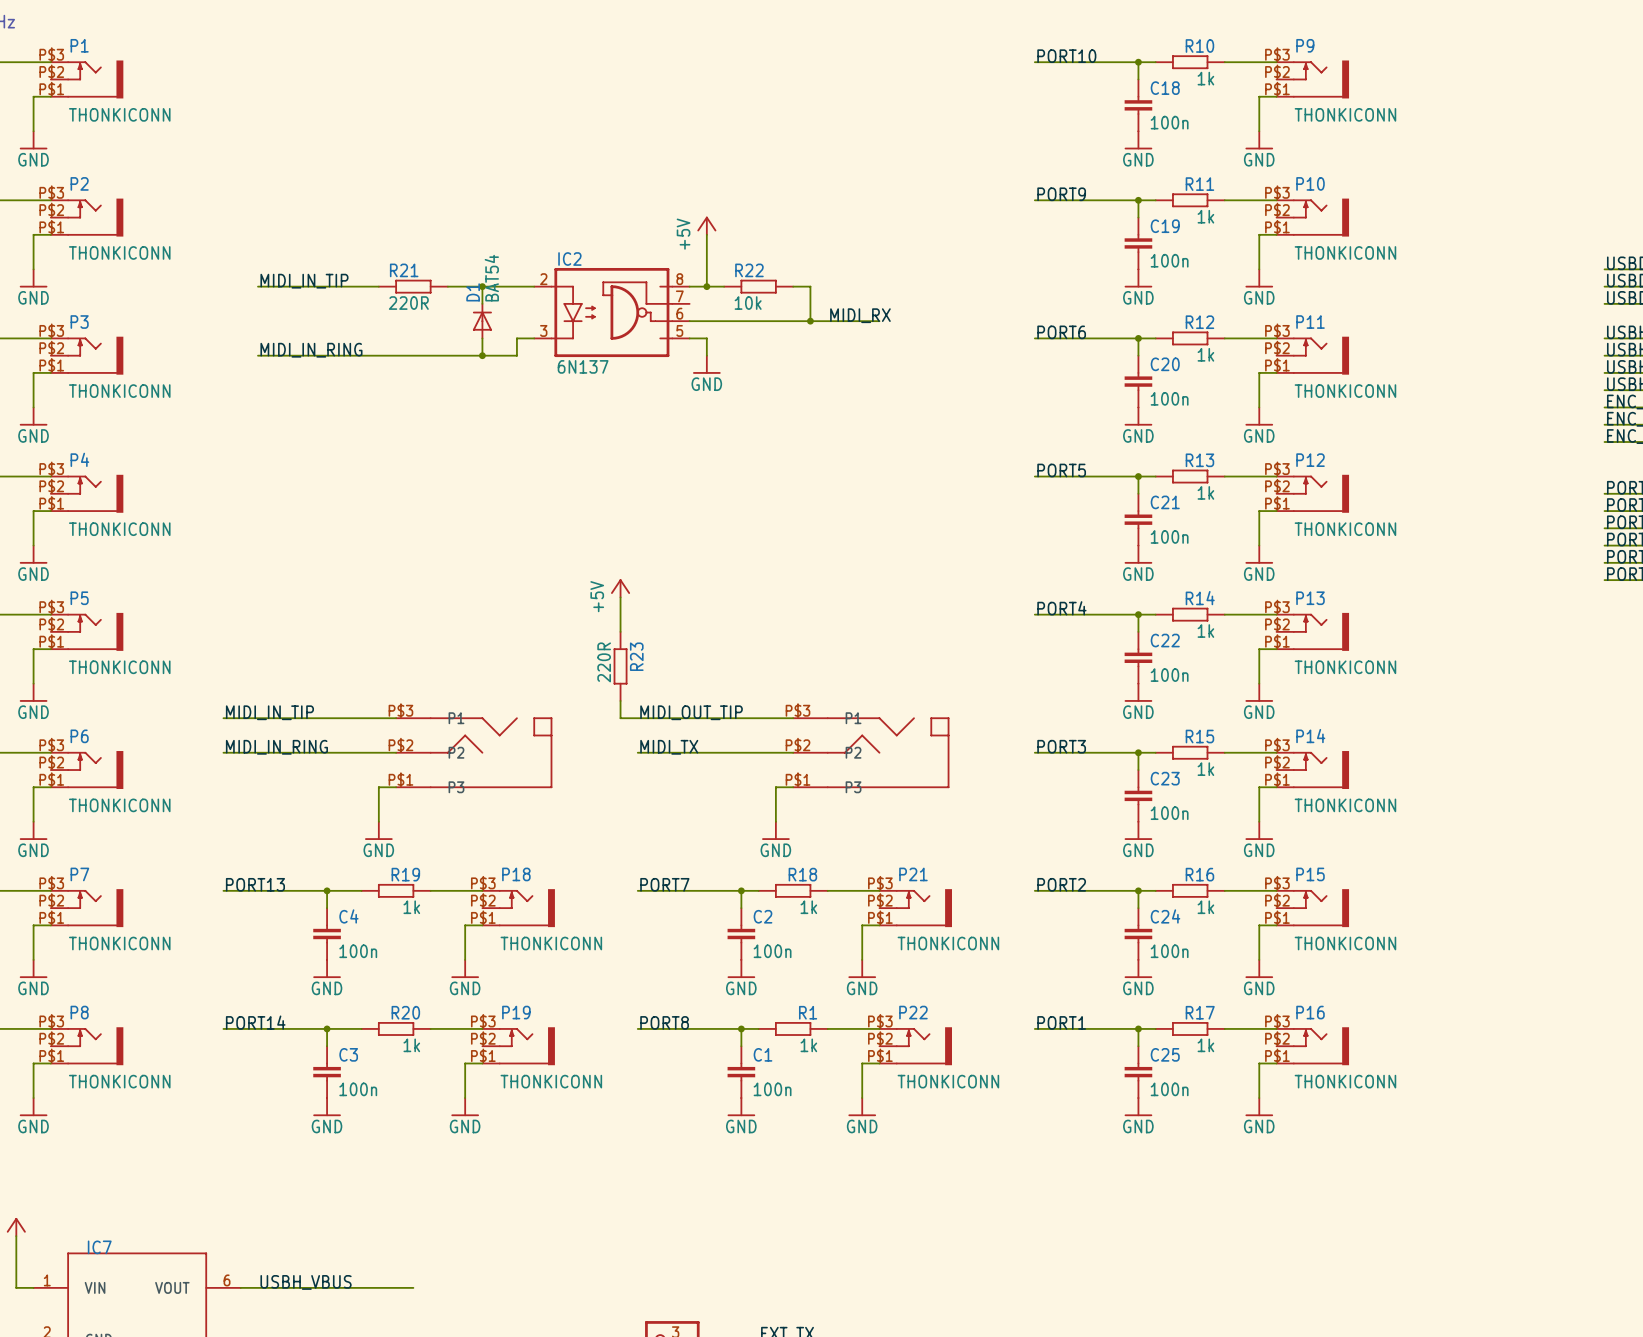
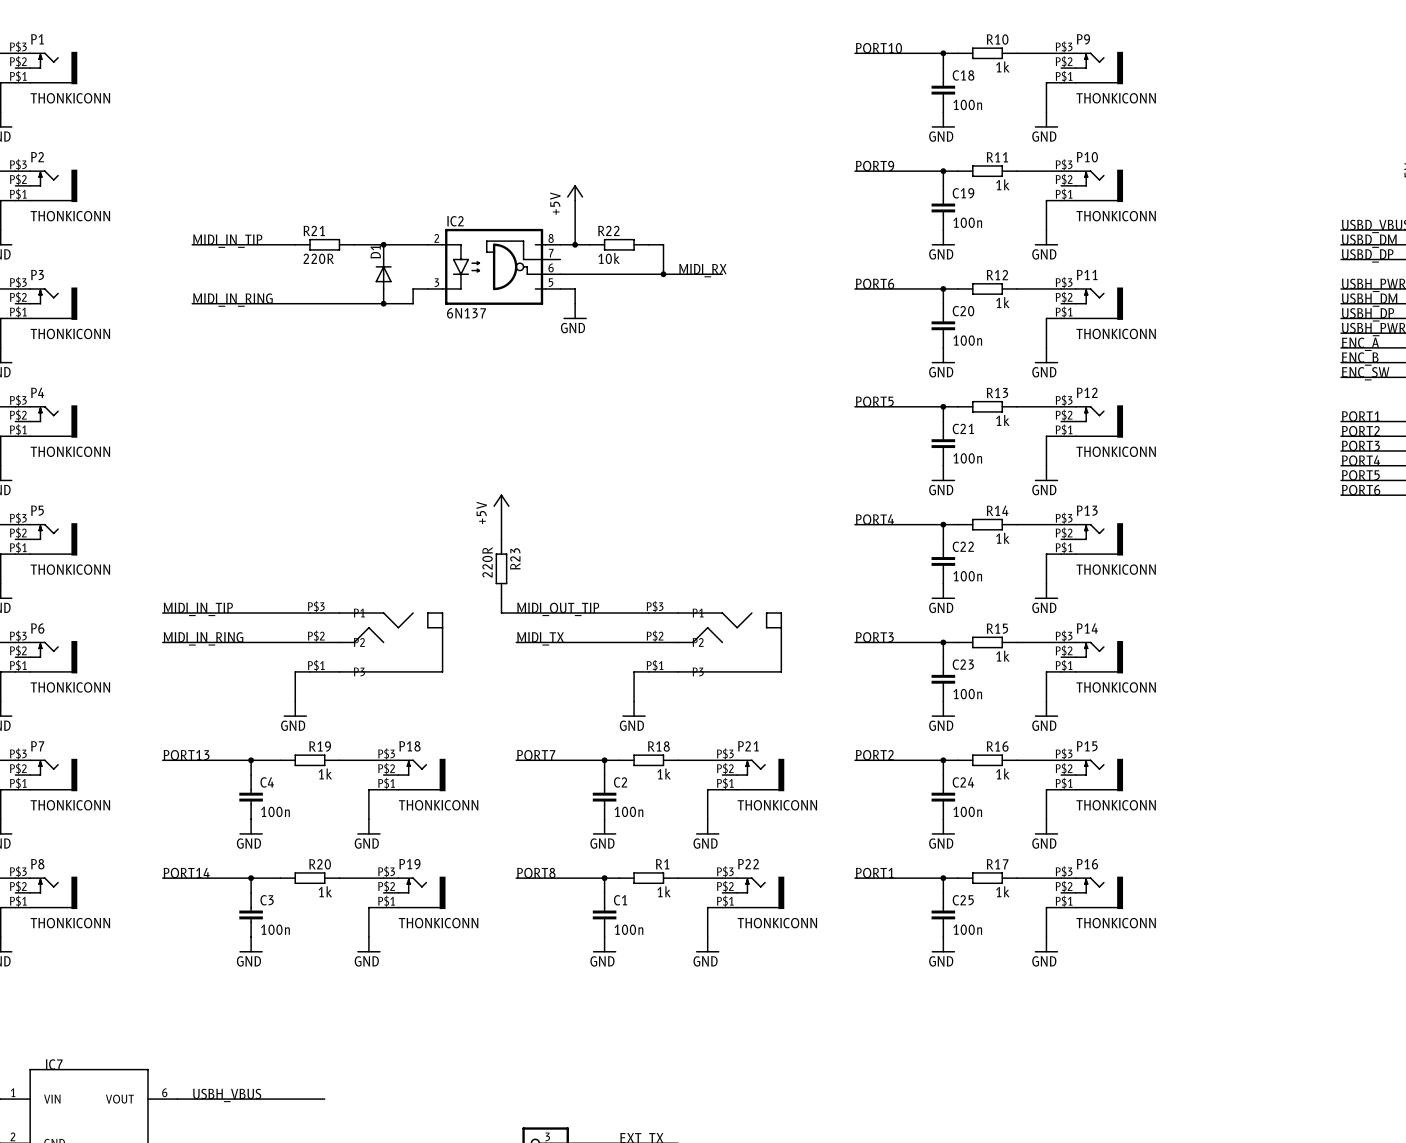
D1 value: BAT54 (491, 278) -> none

